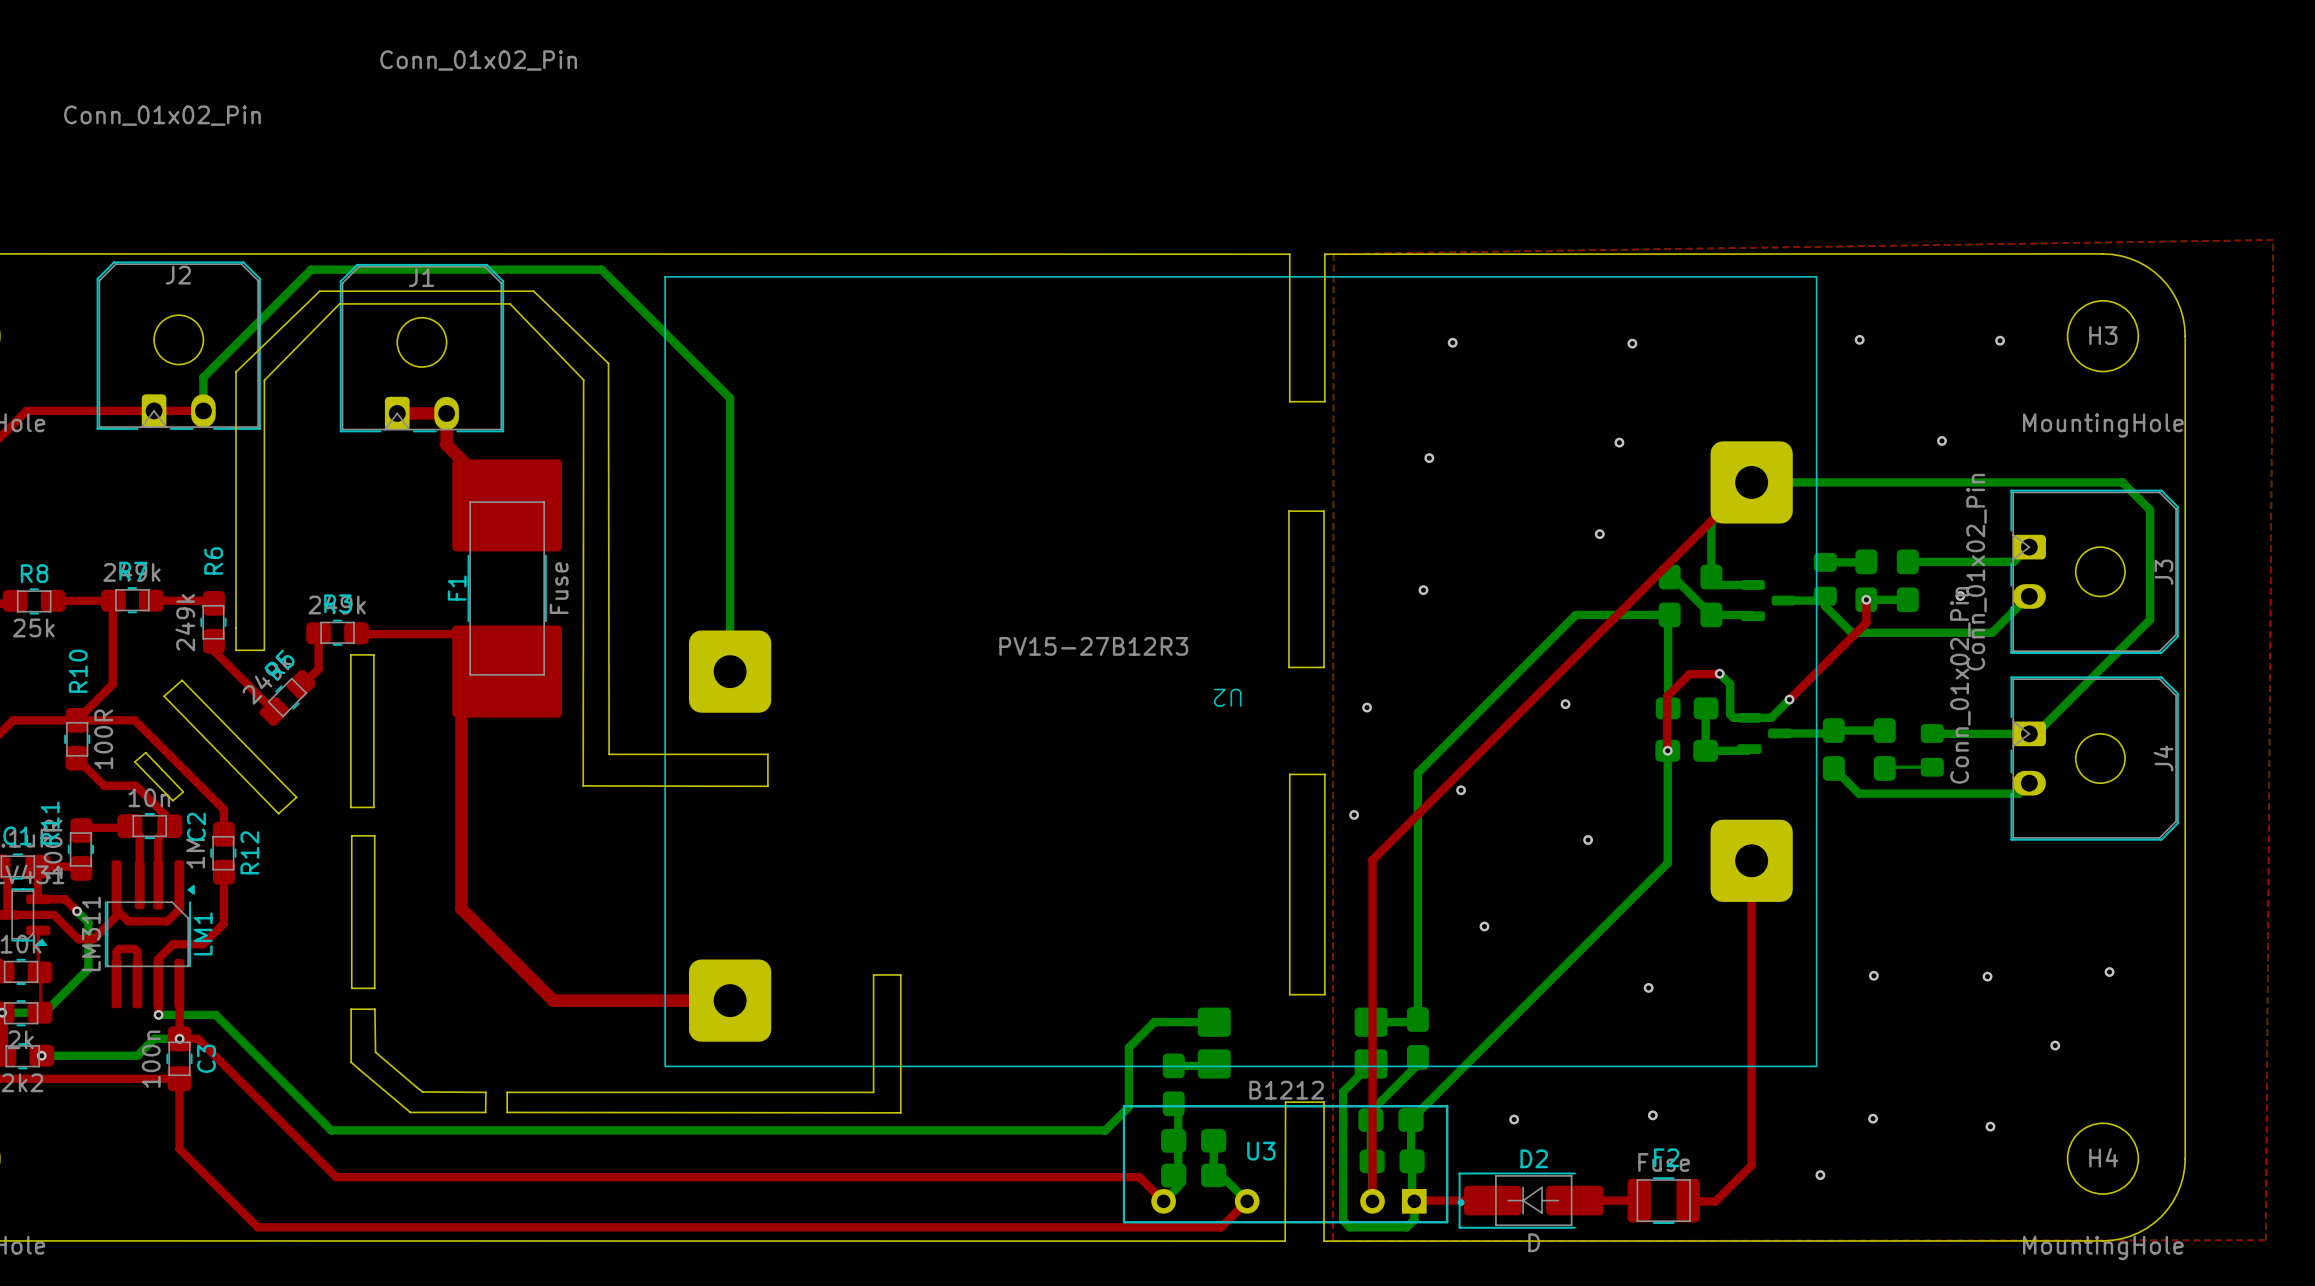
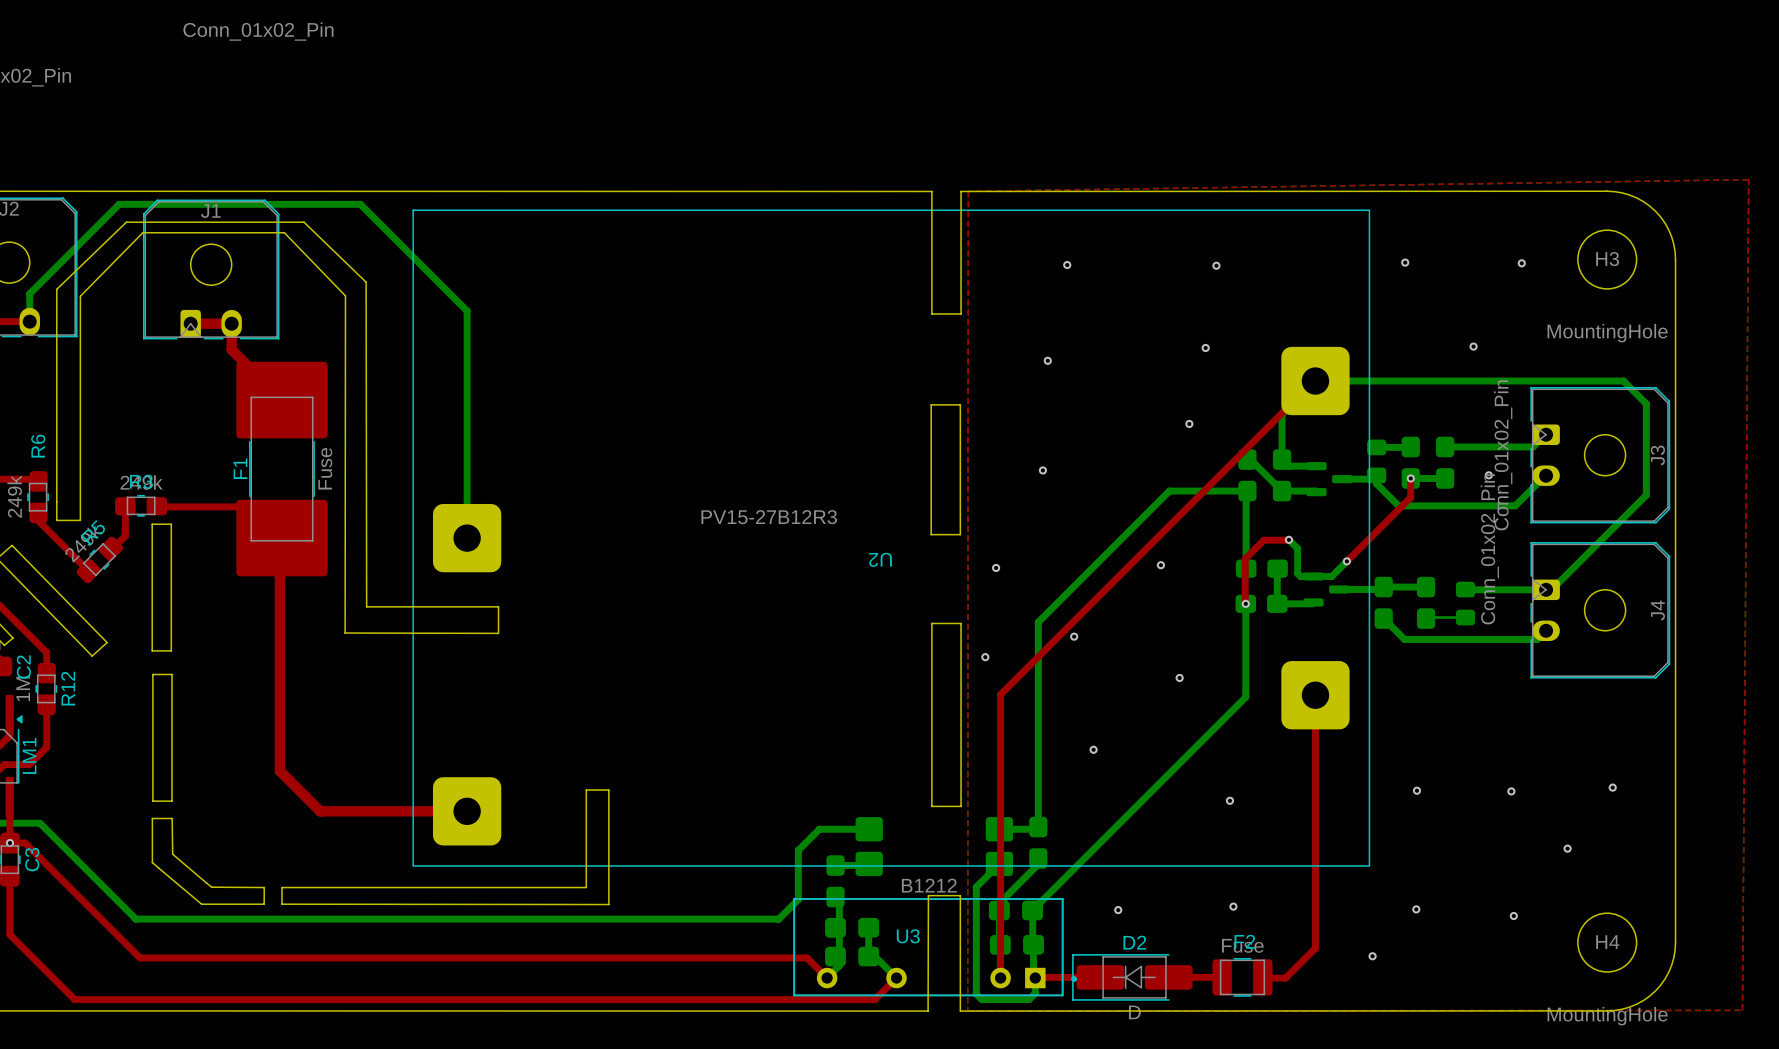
top track: (461, 683) (461, 908) (504, 951) -> (243, 547) (279, 547) (279, 770)

